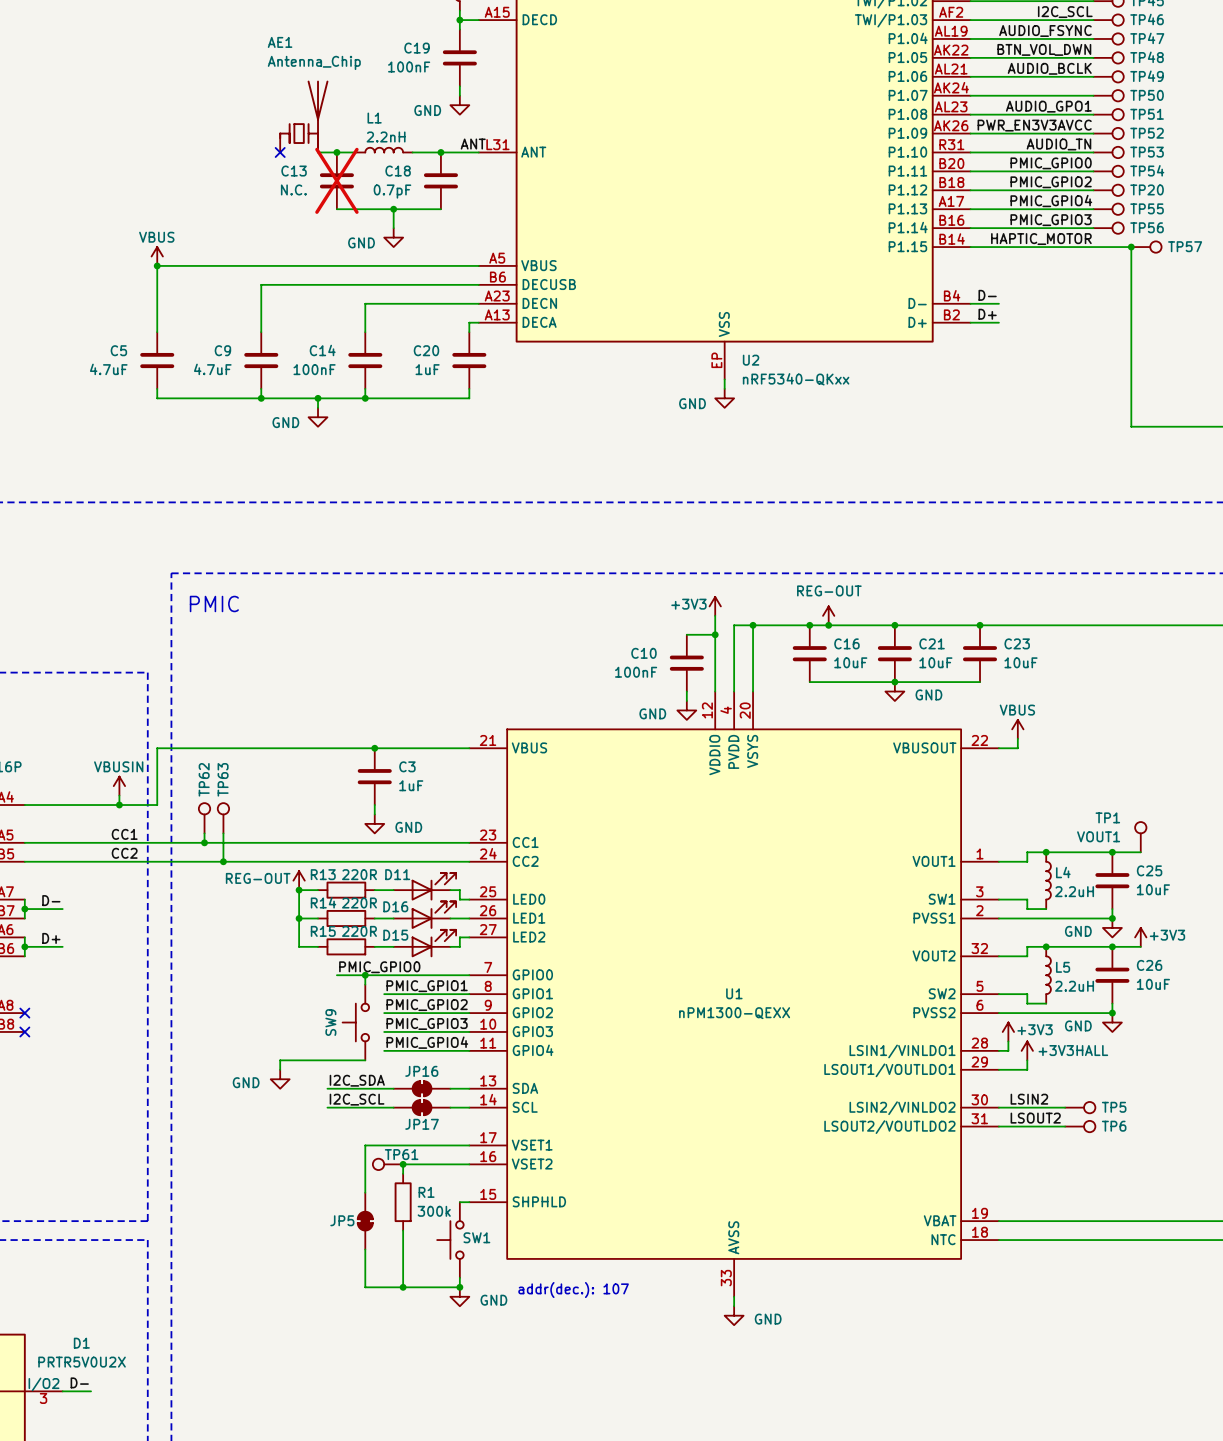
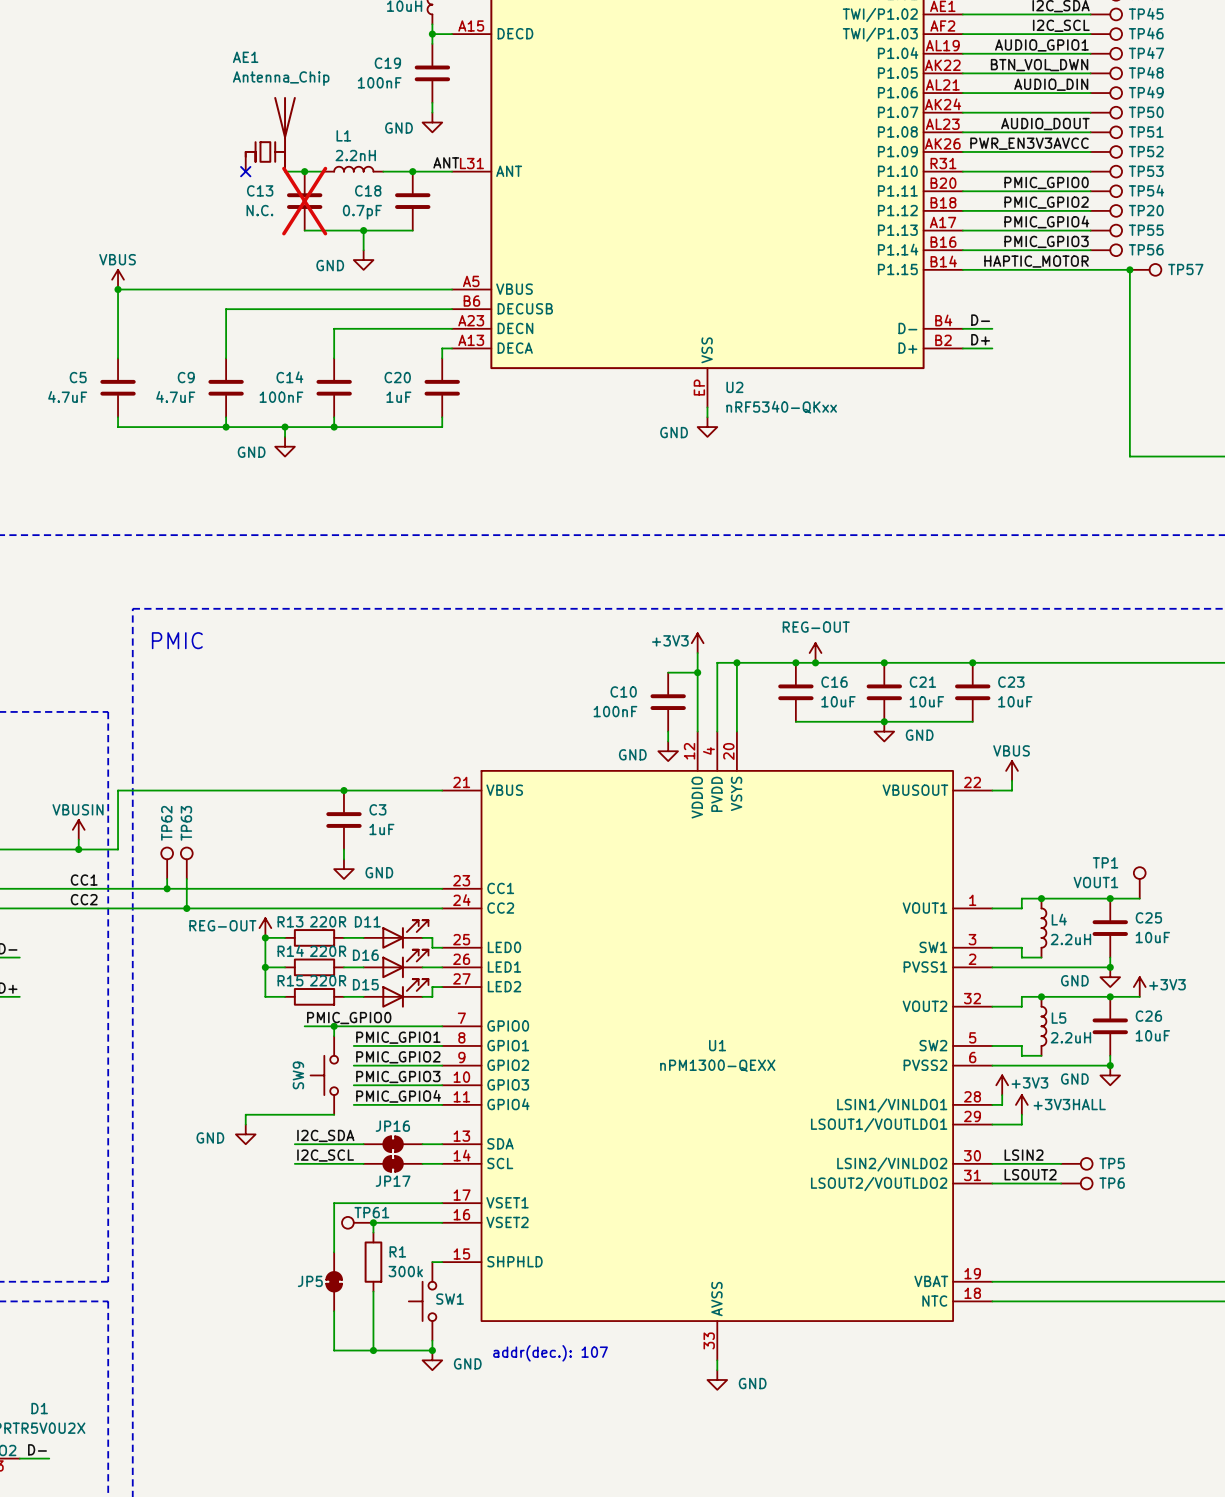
label: AUDIO_FSYNC (1045, 31) -> AUDIO_GPIO1 (1041, 45)
label: AUDIO_BCLK (1049, 68) -> AUDIO_DIN (1051, 84)
label: AUDIO_GPO1 (1048, 106) -> AUDIO_DOUT (1045, 124)
label: AUDIO_TN (1058, 144) -> none

